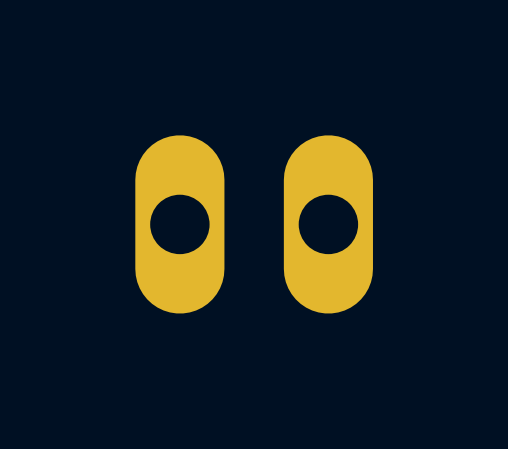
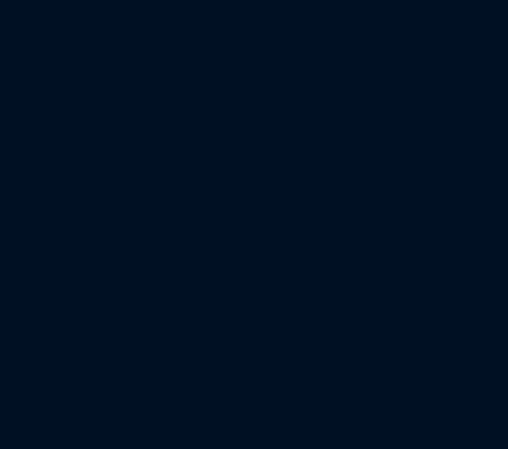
part: (254, 224) -> none

